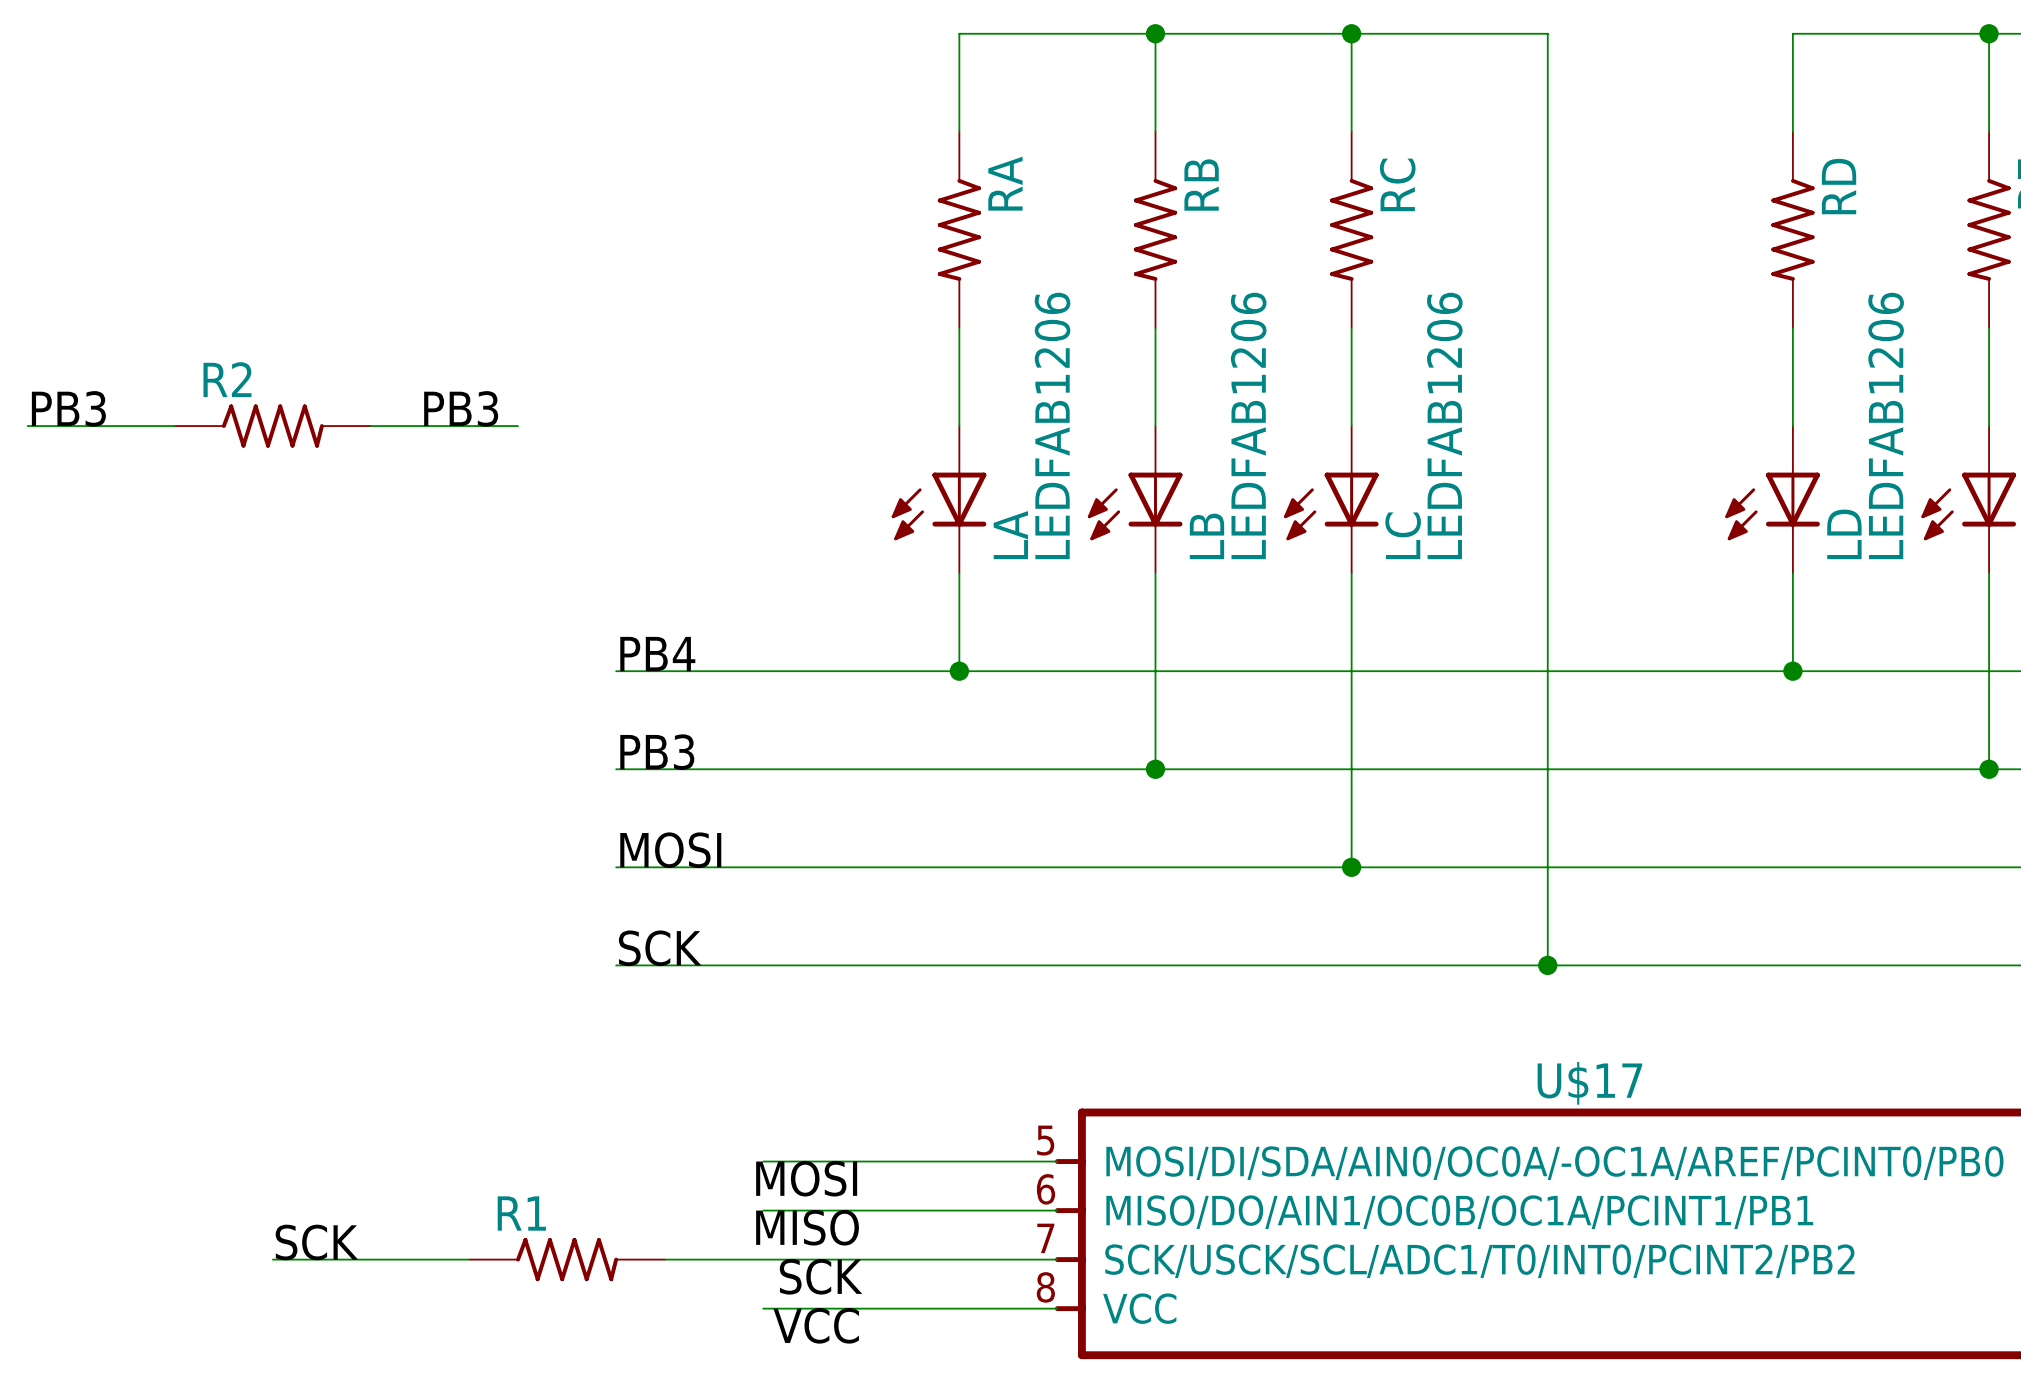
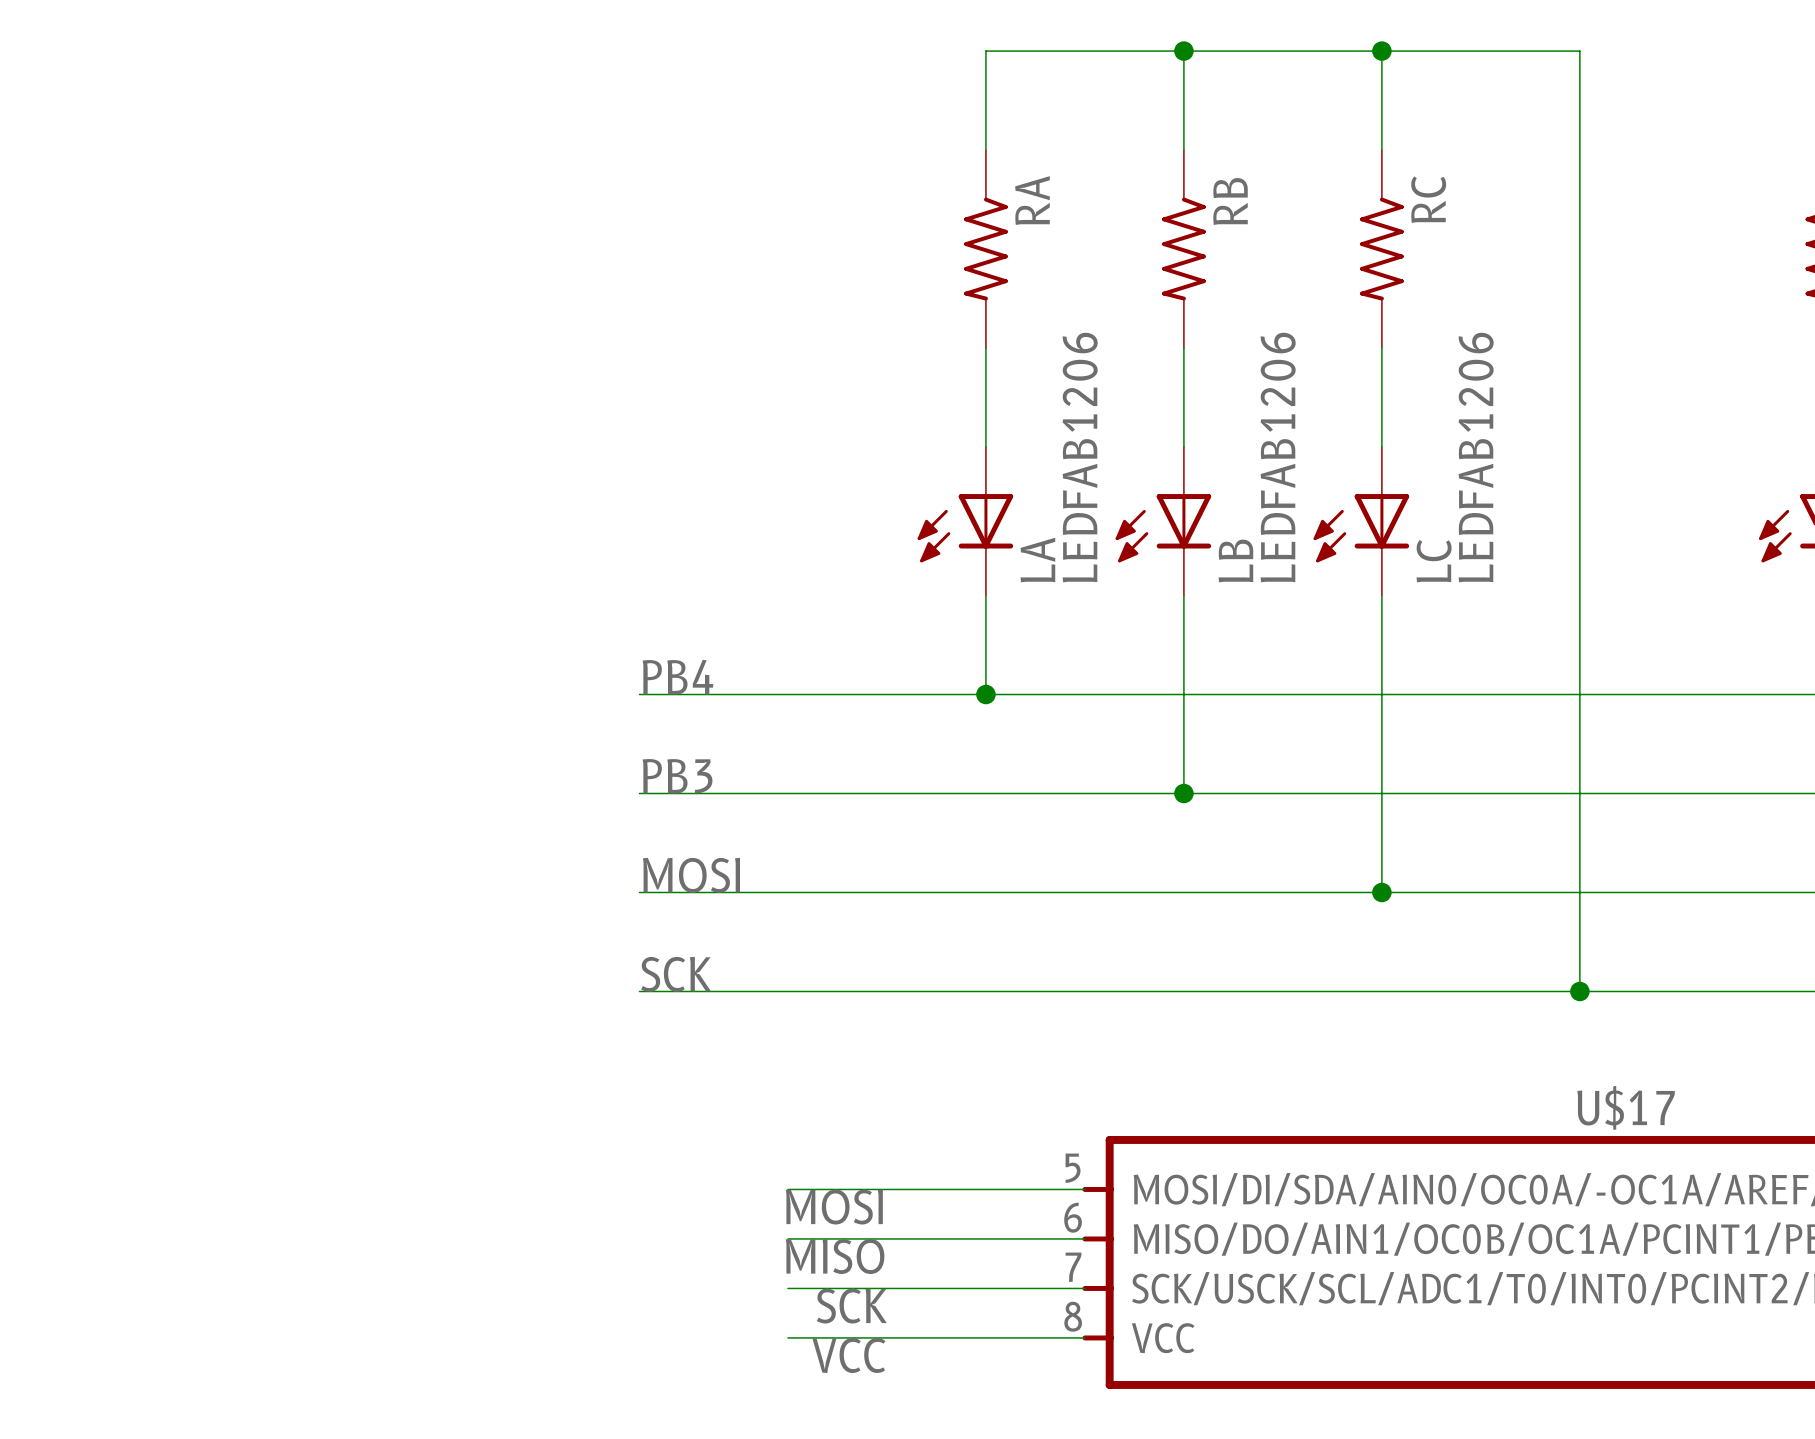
label: PB3 (68, 408) -> none
label: PB3 (461, 408) -> none
wire: (27, 426) (174, 426) -> none
R2: (272, 426) -> none
wire: (370, 426) (518, 426) -> none
label: SCK (316, 1242) -> none
wire: (272, 1259) (469, 1259) -> none
R1: (567, 1259) -> none
wire: (665, 1259) (763, 1259) -> none

